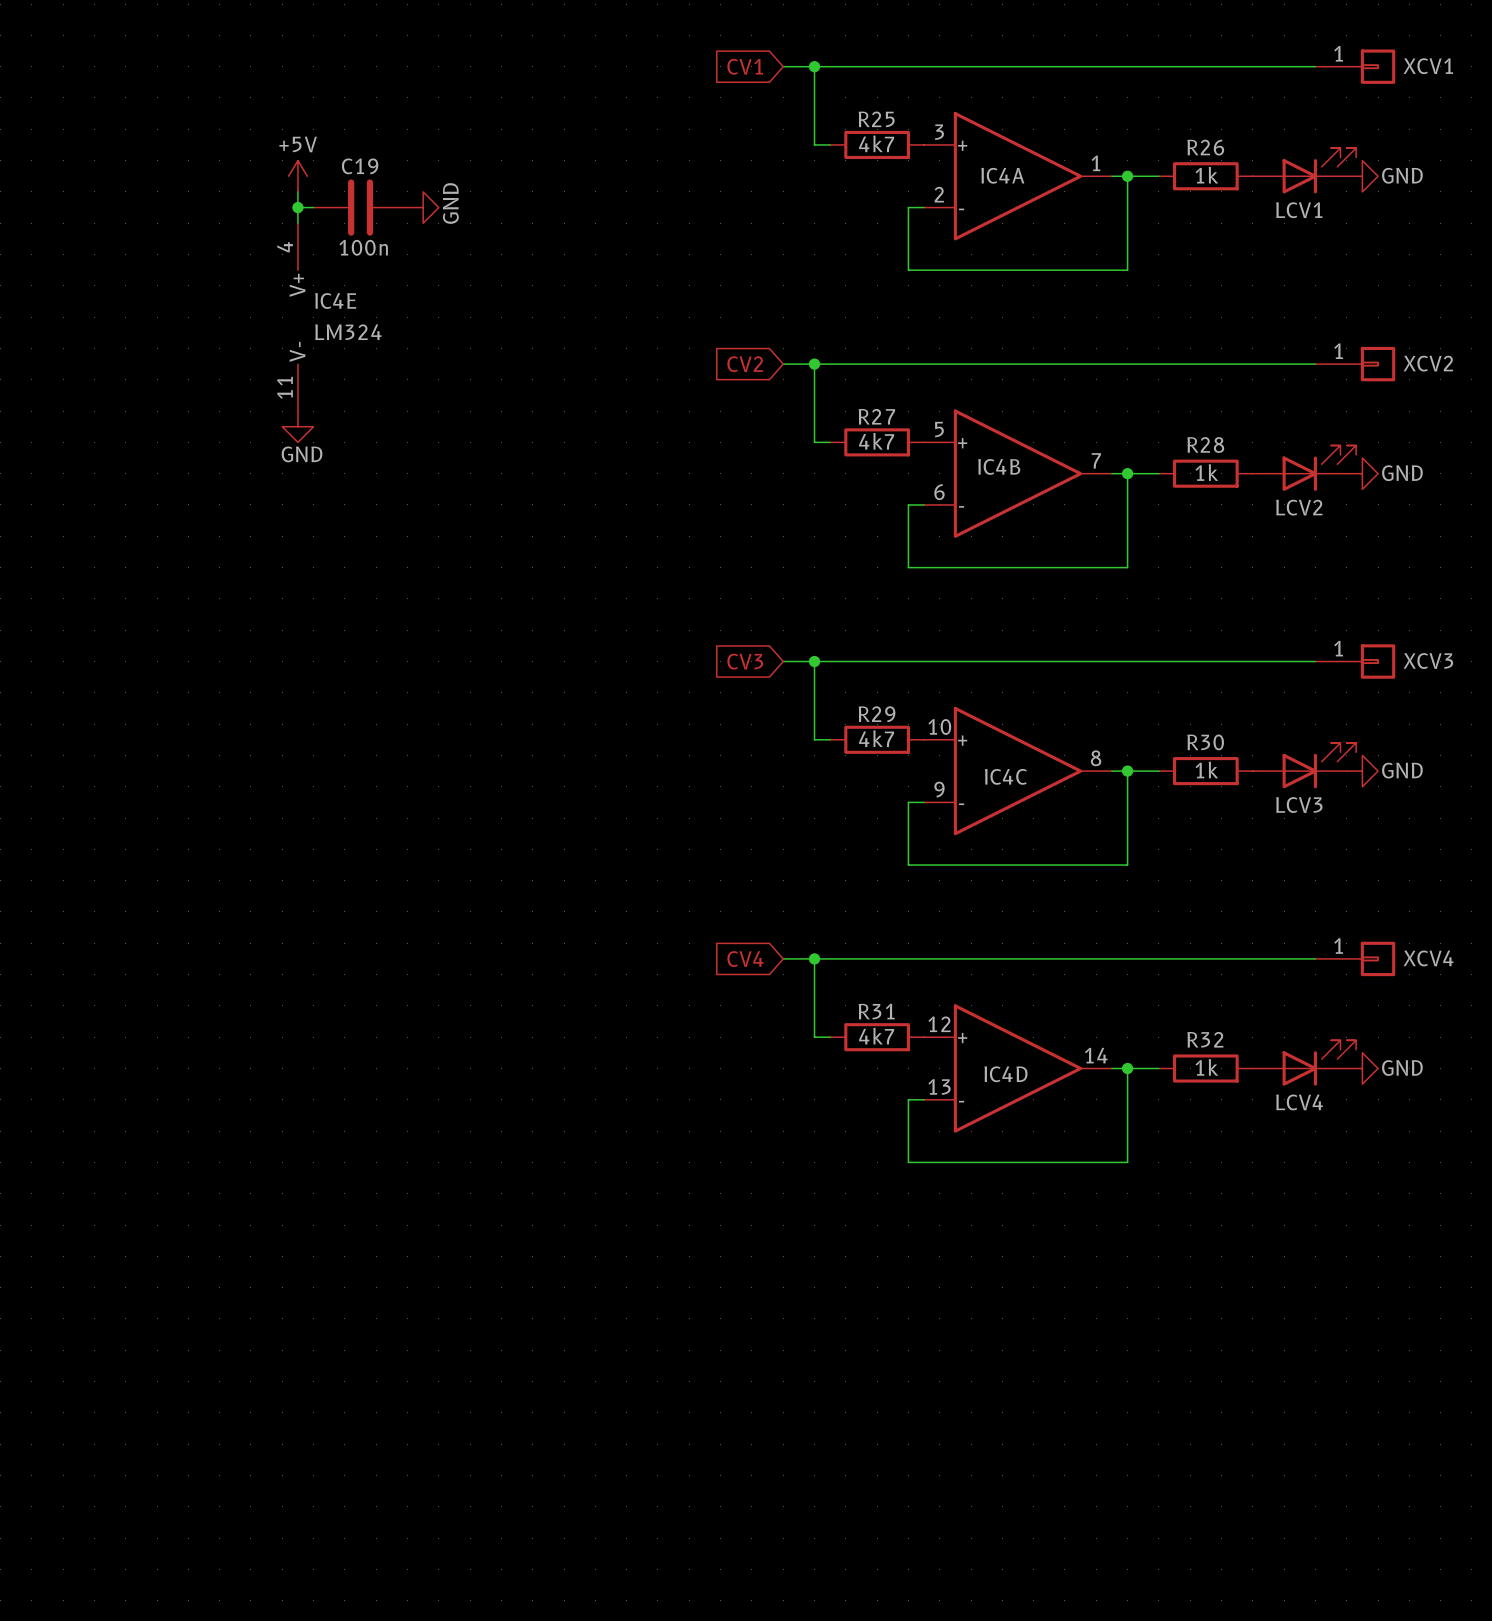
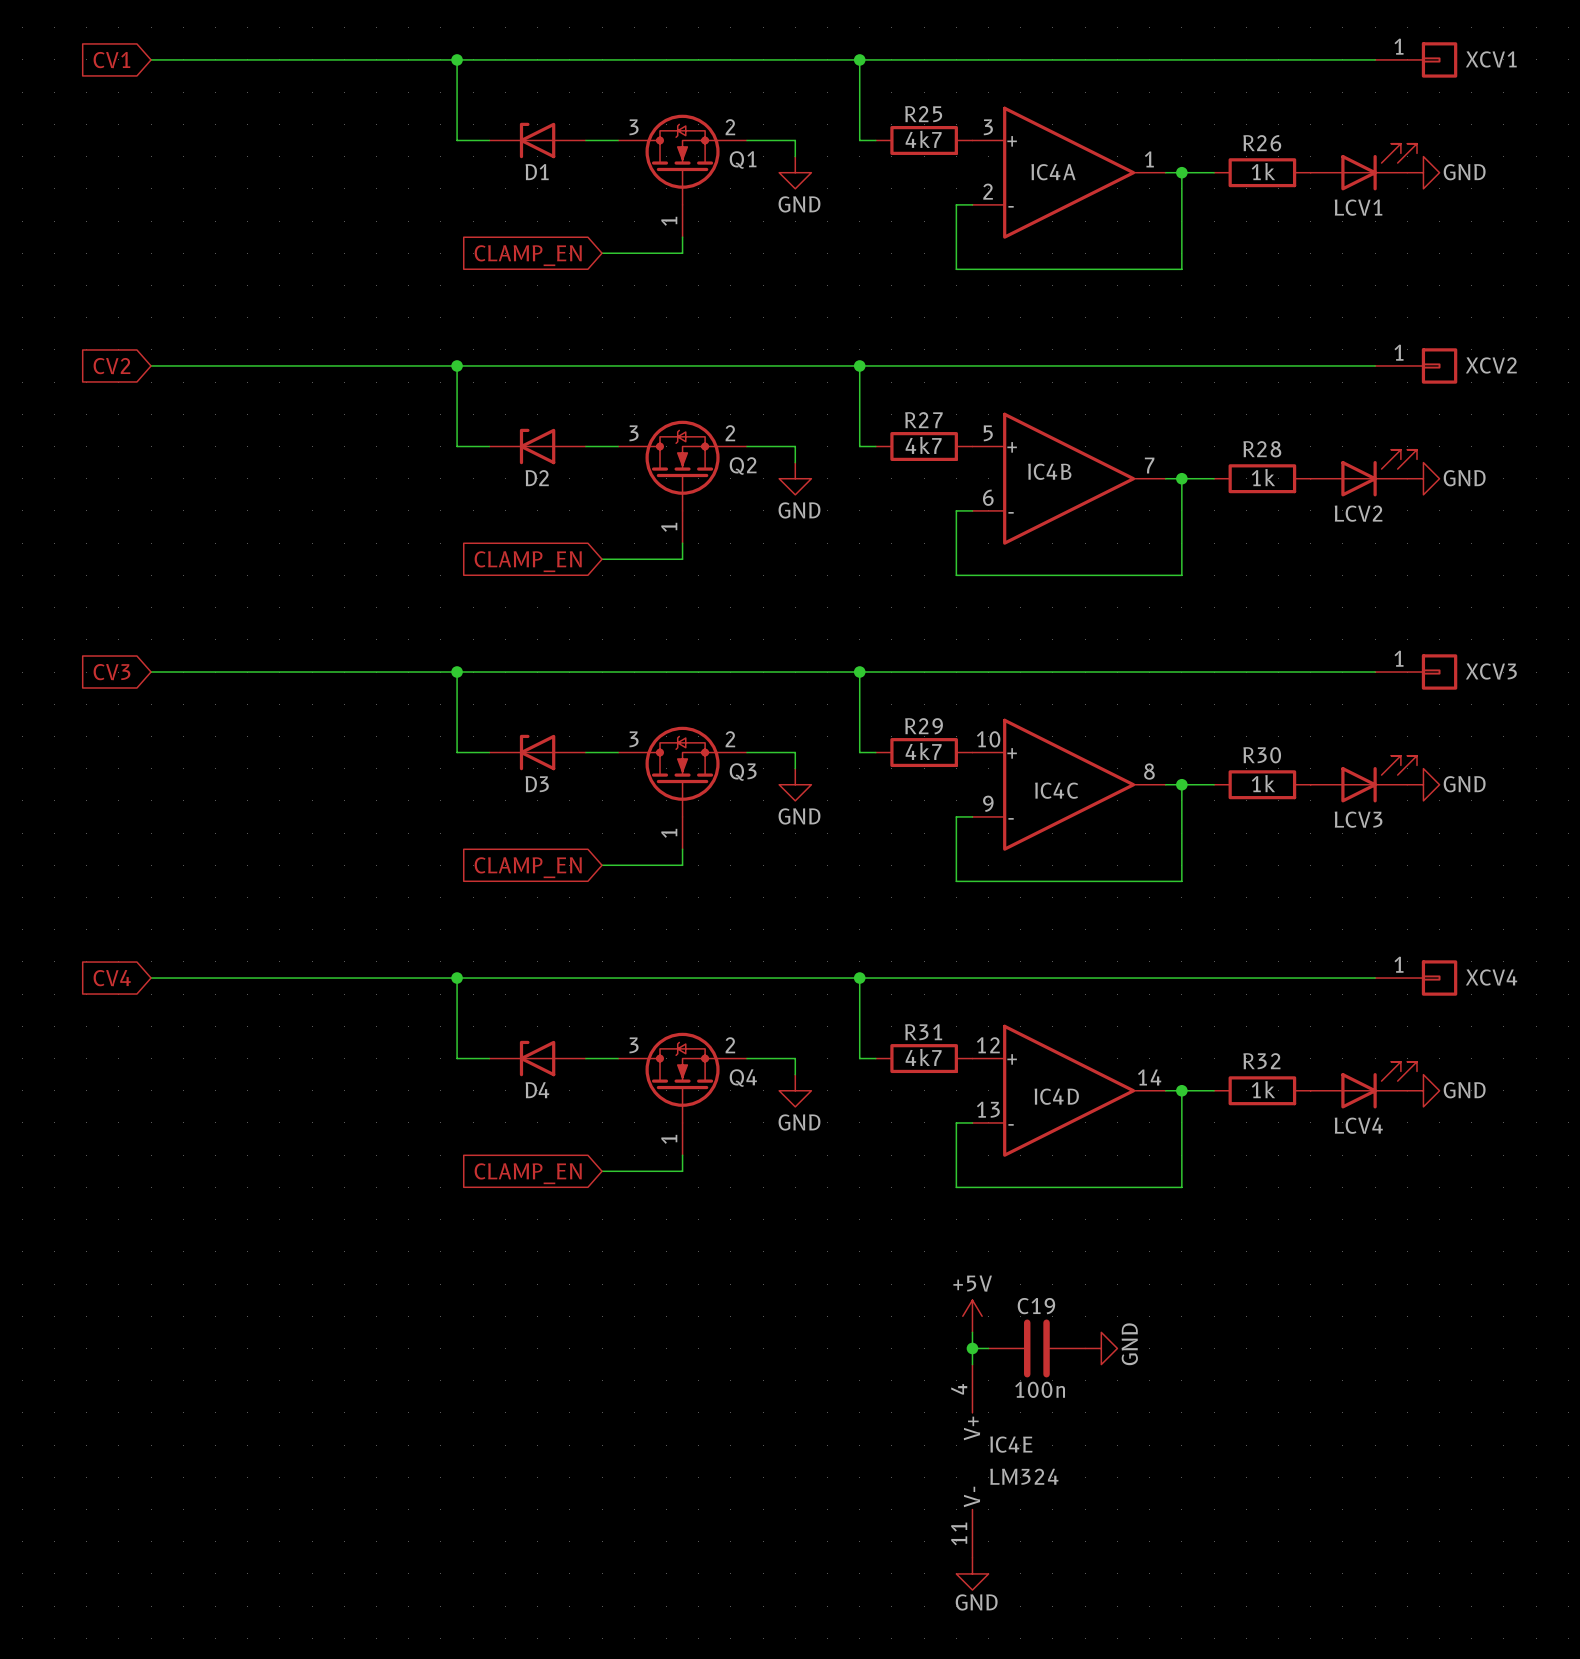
global label: none -> CV1 (111, 60)
wire: none -> (151, 59) (827, 59)
wire: none -> (457, 59) (457, 140) (489, 140)
junction: none -> (457, 59)
global label: CV1 (745, 66) -> none
D1: none -> (537, 140)
wire: none -> (585, 140) (618, 140)
wire: none -> (746, 140) (795, 140) (795, 156)
power symbol: +5V (297, 176) -> none
power symbol: none -> GND (795, 172)
Q1: none -> (682, 175)
wire: (297, 191) (297, 223) -> none
wire: (297, 207) (313, 207) -> none
junction: (297, 207) -> none
C19 position: (360, 207) -> (1036, 1348)
power symbol: GND (423, 207) -> none
wire: none -> (682, 237) (682, 253) (602, 253)
global label: none -> CLAMP_EN (528, 255)
IC4E position: (297, 317) -> (972, 1461)
global label: none -> CV2 (111, 366)
wire: none -> (151, 365) (827, 365)
wire: none -> (457, 365) (457, 446) (489, 446)
junction: none -> (457, 365)
global label: CV2 (745, 364) -> none
power symbol: GND (297, 426) -> none
D2: none -> (537, 446)
wire: none -> (585, 446) (618, 446)
wire: none -> (746, 446) (795, 446) (795, 462)
power symbol: none -> GND (795, 478)
Q2: none -> (682, 481)
wire: none -> (682, 543) (682, 559) (602, 559)
global label: none -> CLAMP_EN (528, 561)
global label: none -> CV3 (111, 672)
wire: none -> (151, 672) (827, 672)
wire: none -> (457, 672) (457, 752) (489, 752)
junction: none -> (457, 672)
global label: CV3 (745, 661) -> none
D3: none -> (537, 752)
wire: none -> (585, 752) (618, 752)
wire: none -> (746, 752) (795, 752) (795, 768)
power symbol: none -> GND (795, 784)
Q3: none -> (682, 787)
wire: none -> (682, 849) (682, 865) (602, 865)
global label: none -> CLAMP_EN (528, 867)
wire: none -> (151, 978) (827, 978)
wire: none -> (457, 978) (457, 1058) (489, 1058)
junction: none -> (457, 978)
global label: none -> CV4 (112, 978)
global label: CV4 (745, 959) -> none
D4: none -> (537, 1058)
wire: none -> (585, 1058) (618, 1058)
wire: none -> (746, 1058) (795, 1058) (795, 1074)
power symbol: none -> GND (795, 1090)
Q4: none -> (682, 1093)
wire: none -> (682, 1155) (682, 1171) (602, 1171)
global label: none -> CLAMP_EN (528, 1173)
power symbol: none -> +5V (972, 1316)
wire: none -> (972, 1332) (972, 1364)
wire: none -> (972, 1348) (988, 1348)
junction: none -> (972, 1348)
power symbol: none -> GND (1101, 1348)
power symbol: none -> GND (972, 1573)

